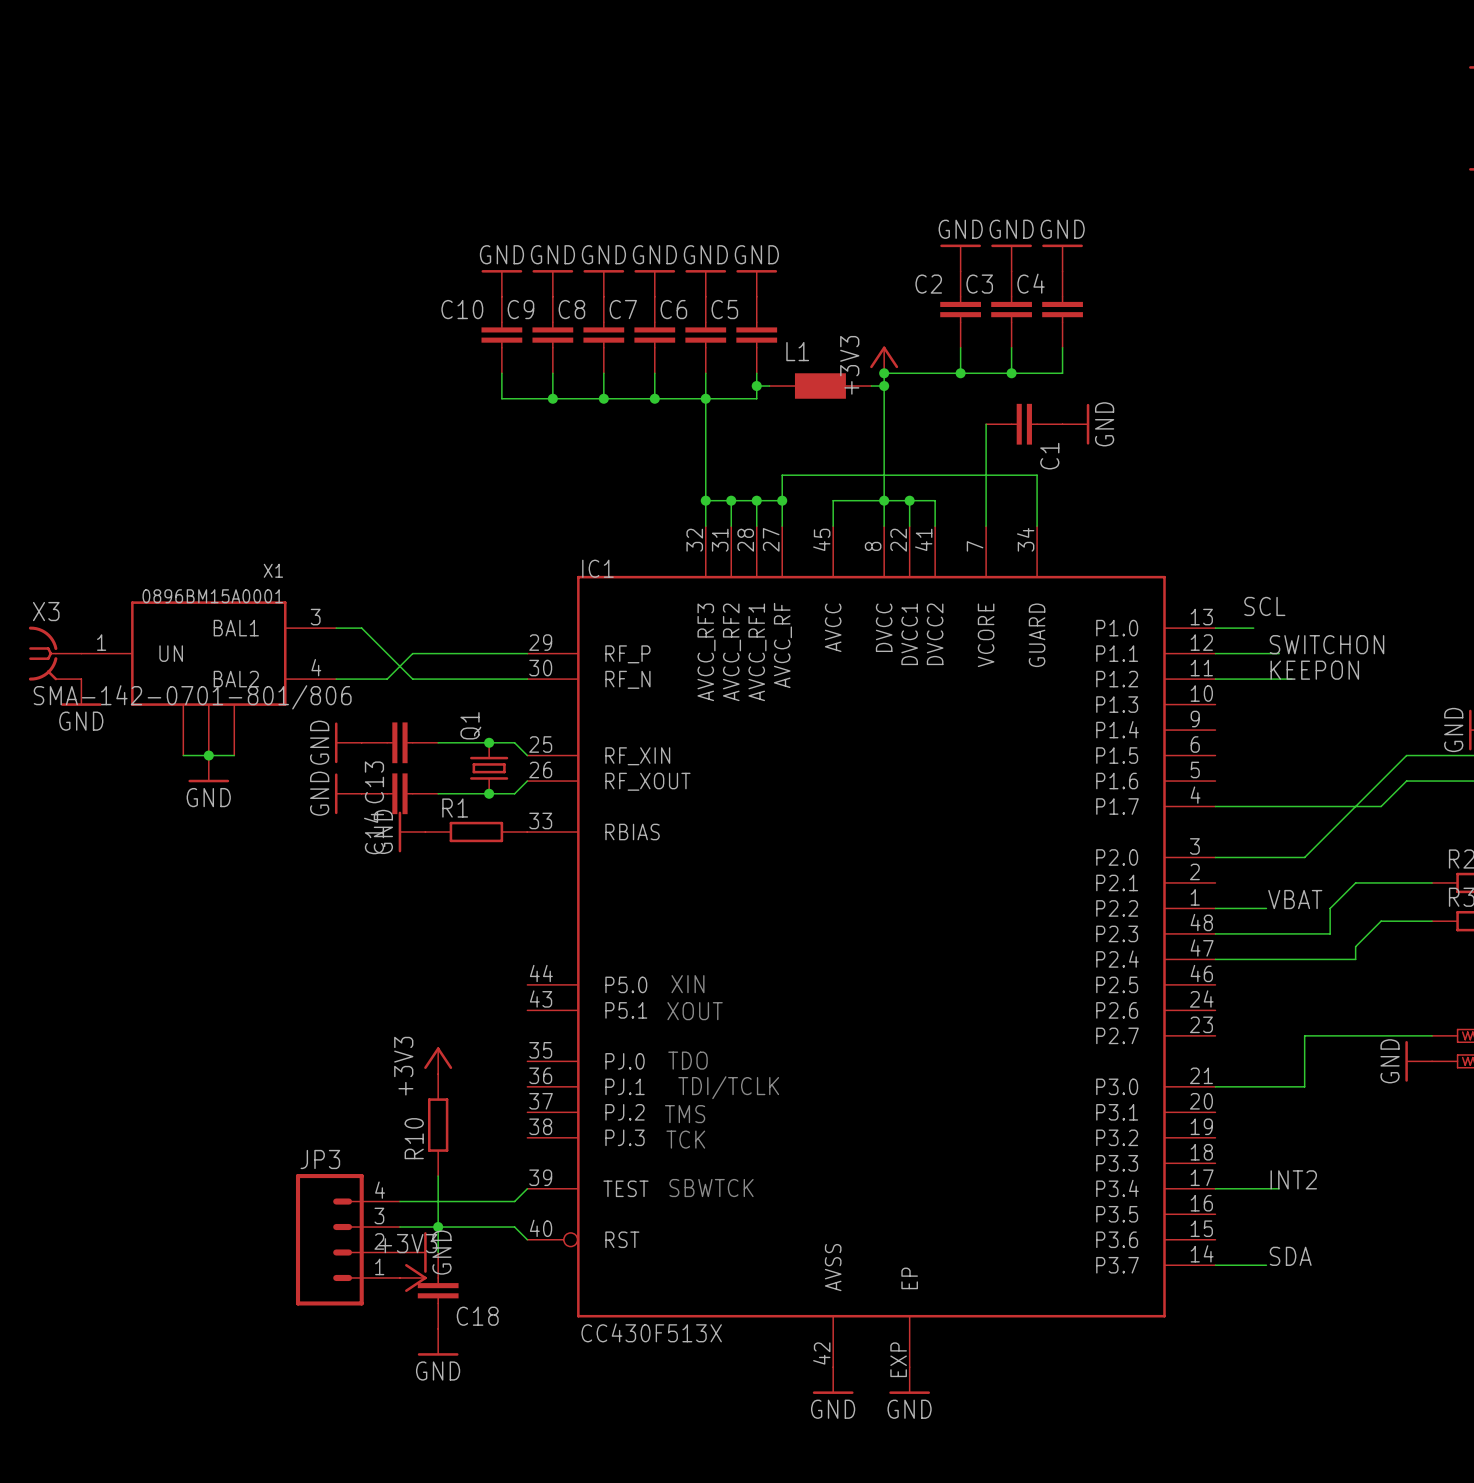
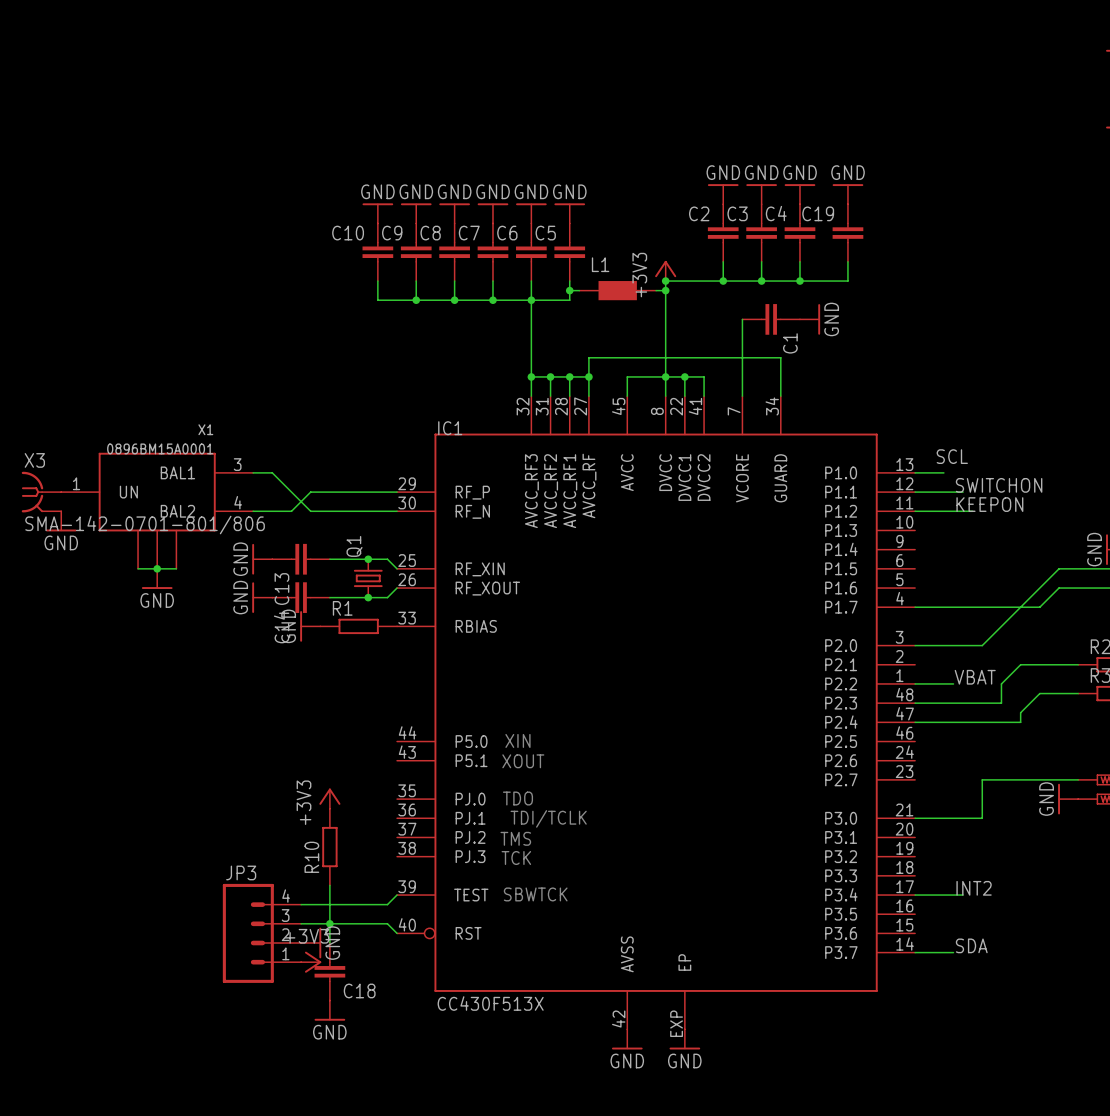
power symbol: none -> GND (847, 194)
C19: none -> (847, 233)
wire: none -> (847, 261) (847, 281) (799, 281)
junction: none -> (799, 281)

